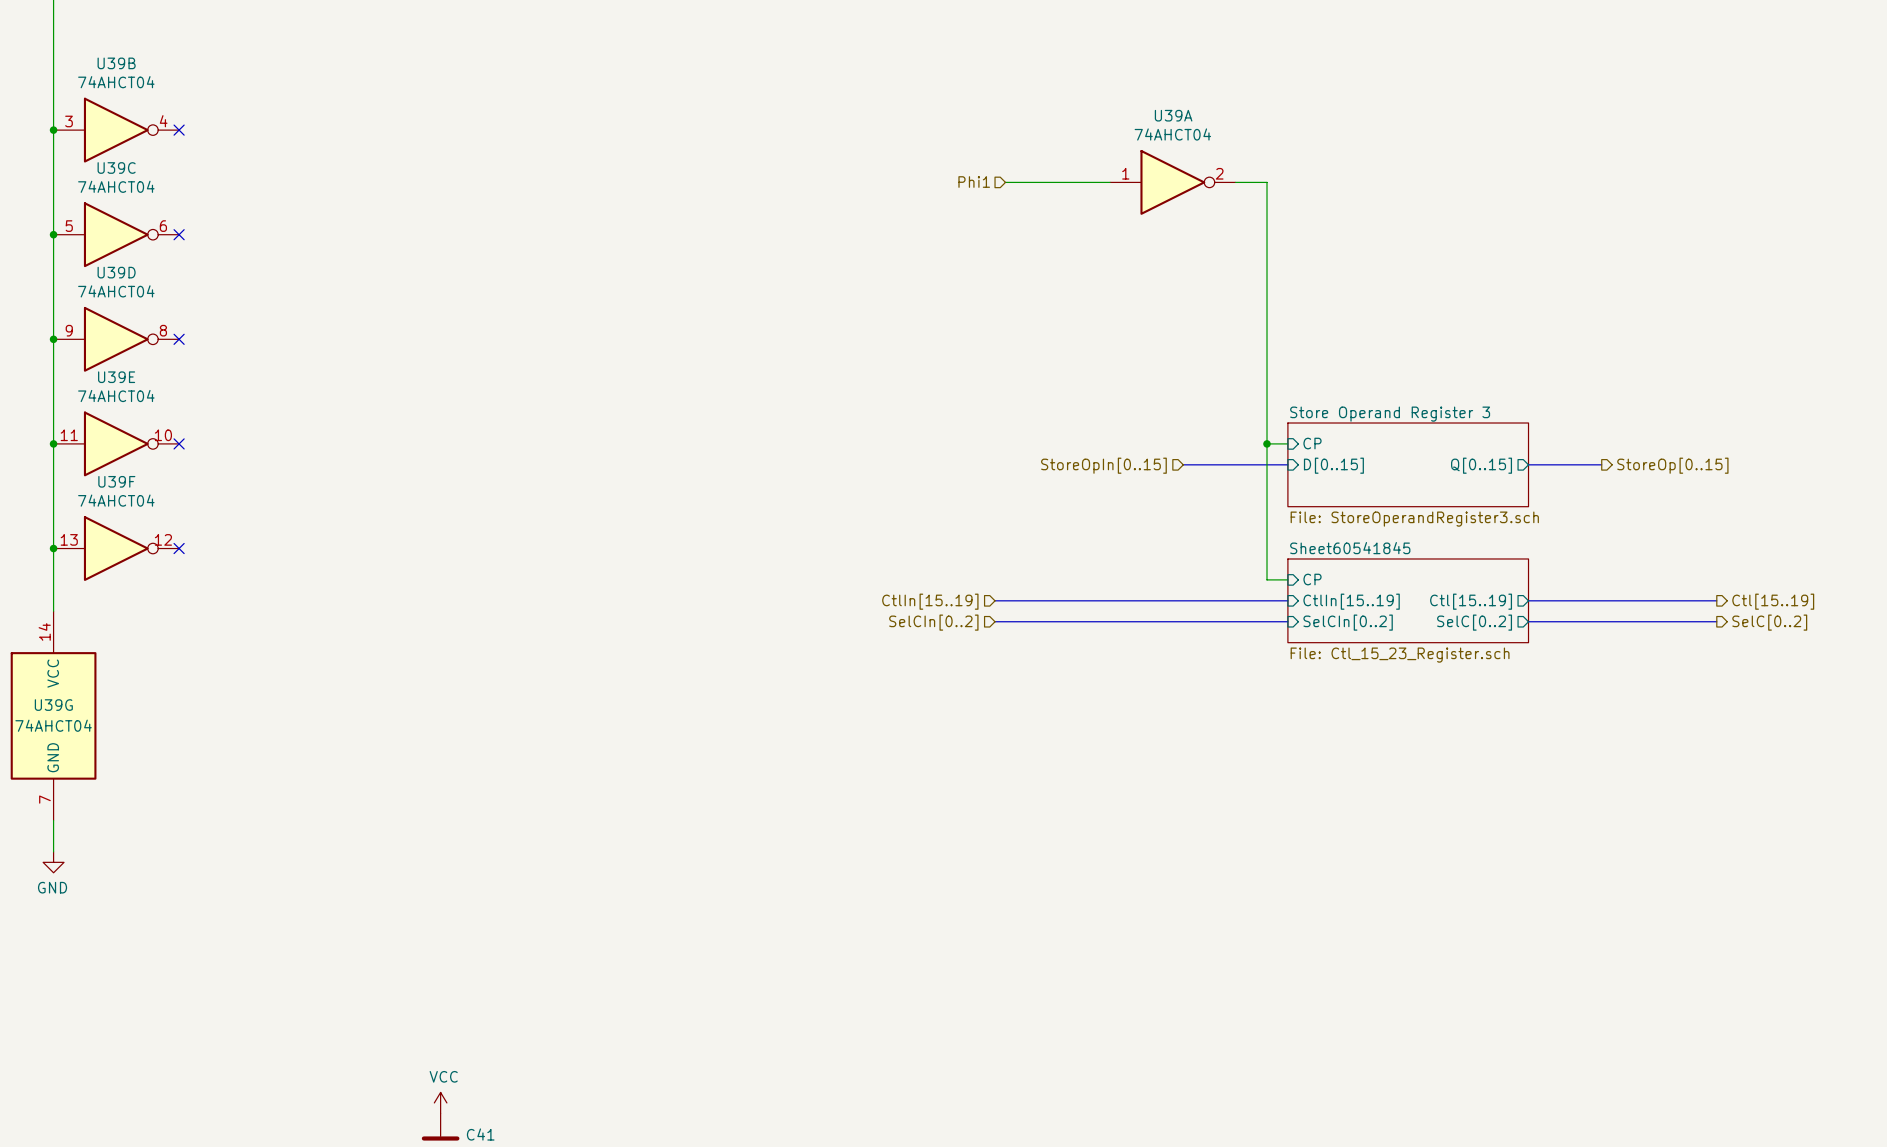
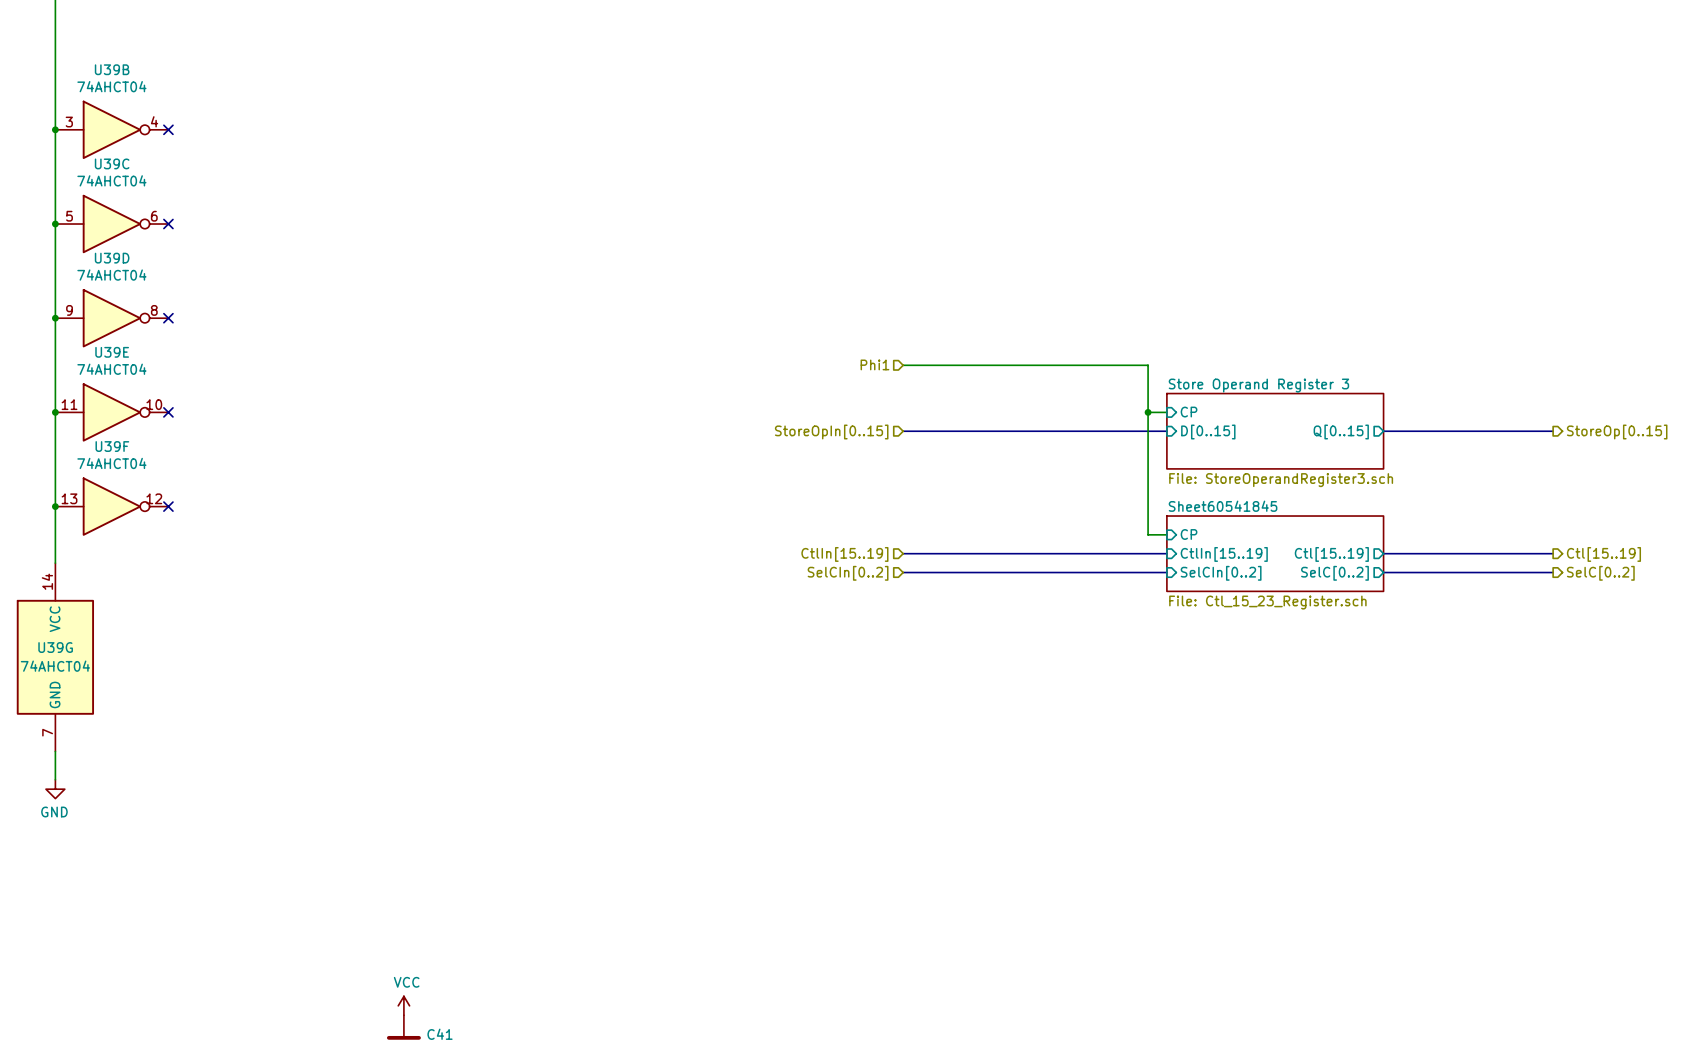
hierarchical label: Phi1 (974, 182) -> none
wire: (1005, 182) (1110, 182) -> none
U39A: 74AHCT04 (1172, 182) -> none
wire: (1235, 182) (1267, 182) (1267, 391) -> (903, 365) (1148, 365)
hierarchical label: none -> Phi1 (874, 364)
bus: none -> (903, 431) (1072, 431)
bus: none -> (1449, 431) (1553, 431)
hierarchical label position: StoreOpIn[0..15] (1103, 465) -> StoreOpIn[0..15] (831, 432)
hierarchical label position: StoreOp[0..15] (1672, 465) -> StoreOp[0..15] (1617, 432)

